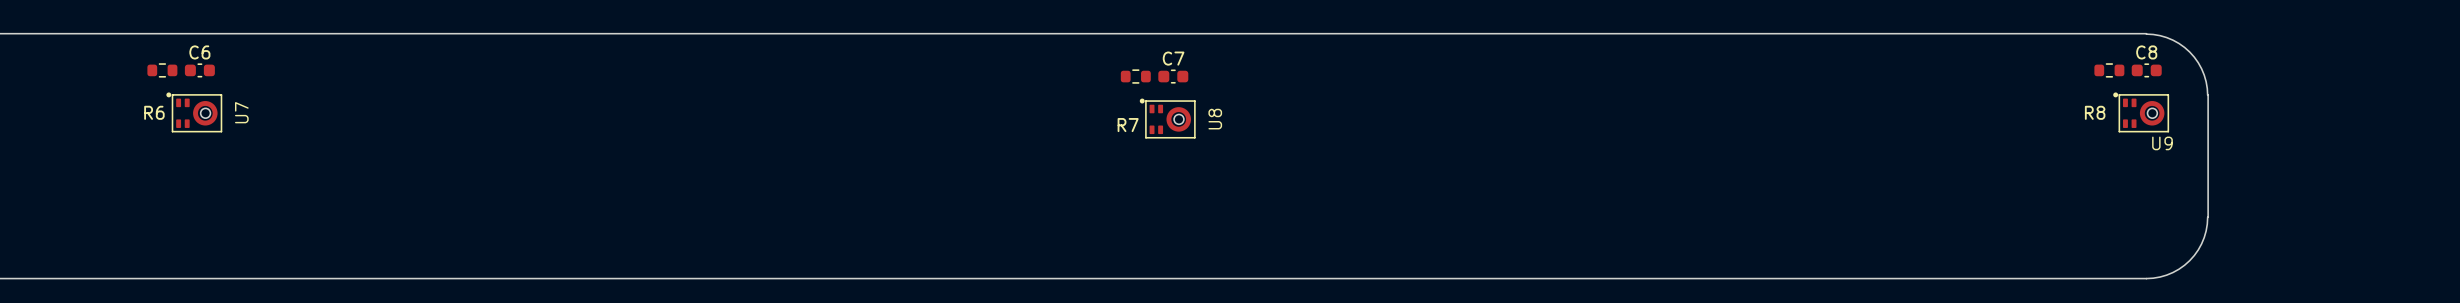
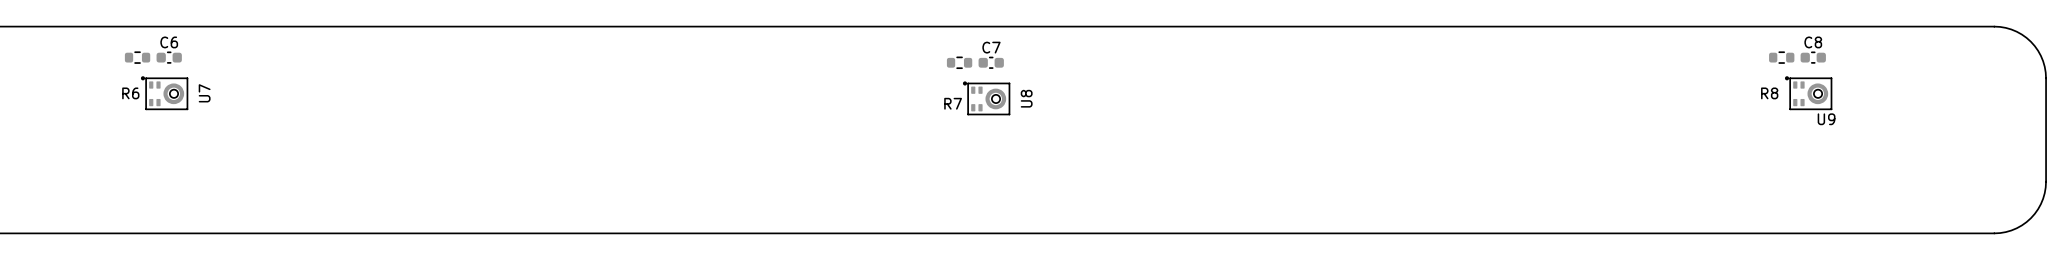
board edge: (2146, 34) (2166, 37) (2179, 43) (2189, 52) (2198, 62) (2204, 75) (2207, 95) -> none
board edge: (2208, 94) (2208, 217) -> none
board edge: (2207, 217) (2206, 230) (2201, 243) (2189, 260) (2173, 272) (2160, 277) (2146, 278) -> (1813, 26) (2005, 27) (2021, 34) (2034, 46) (2043, 61) (2046, 78) (2045, 187) (2038, 209) (2021, 225) (2011, 230) (1994, 233) (1813, 233)

